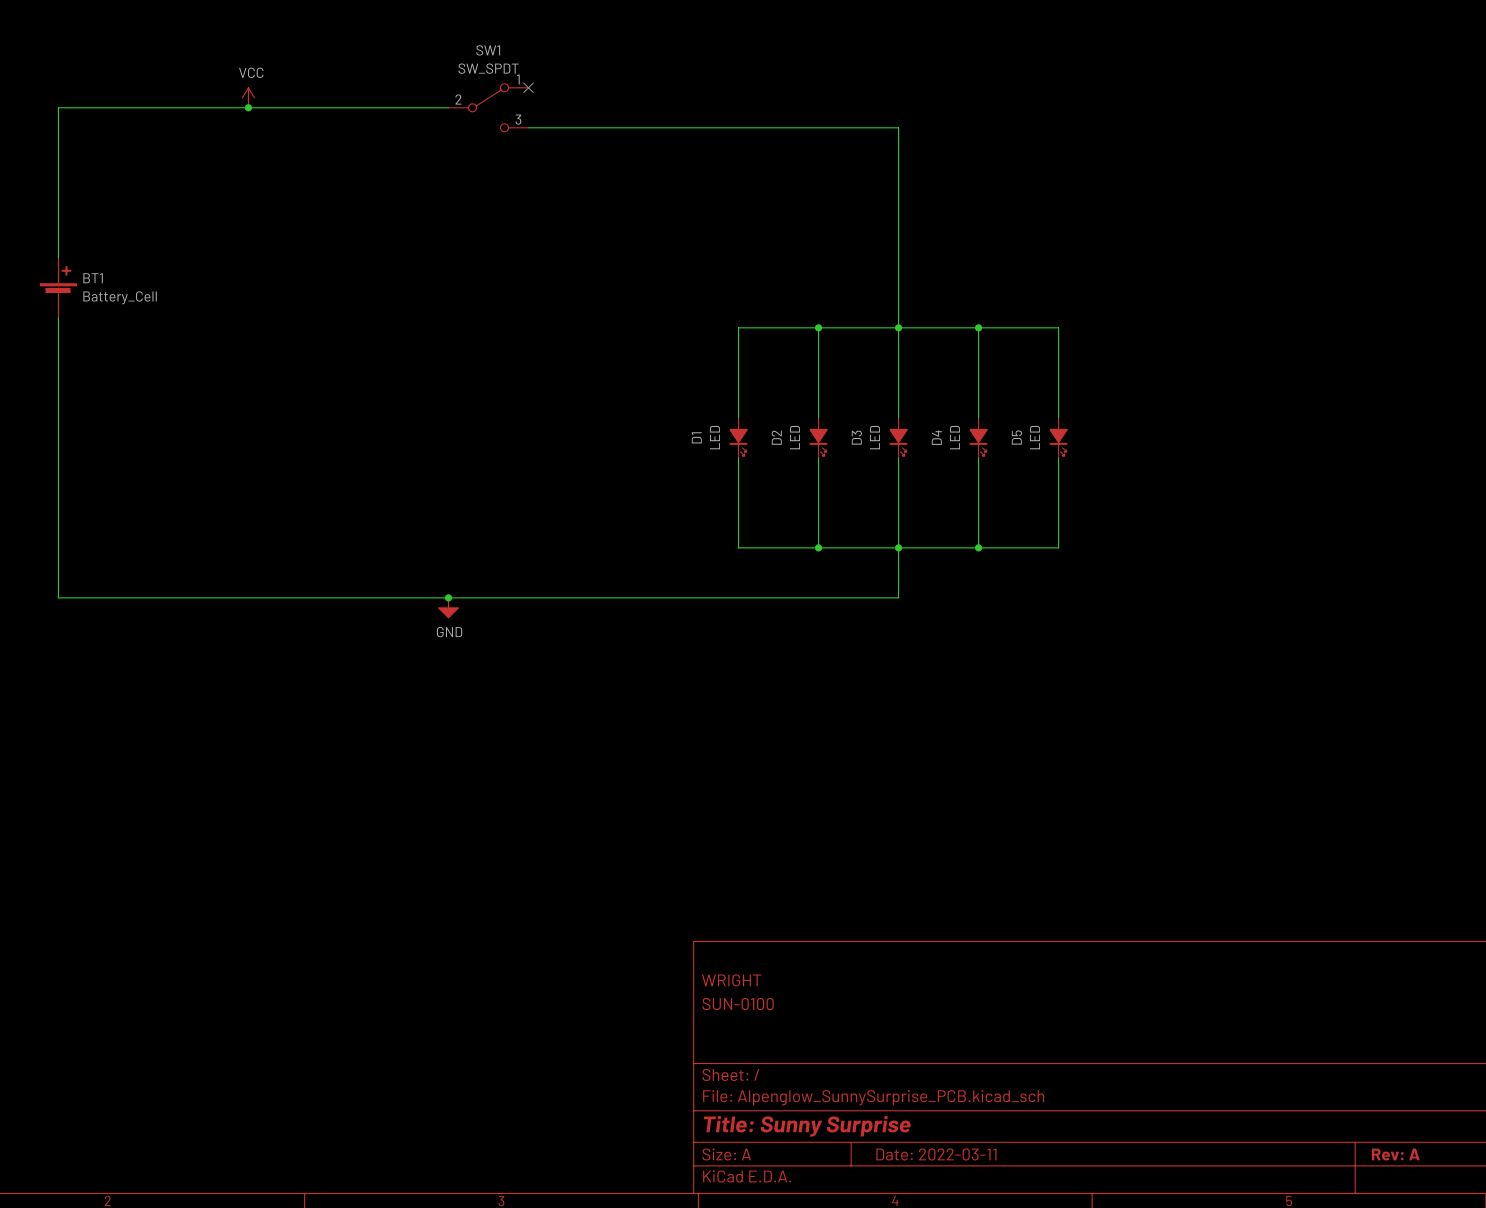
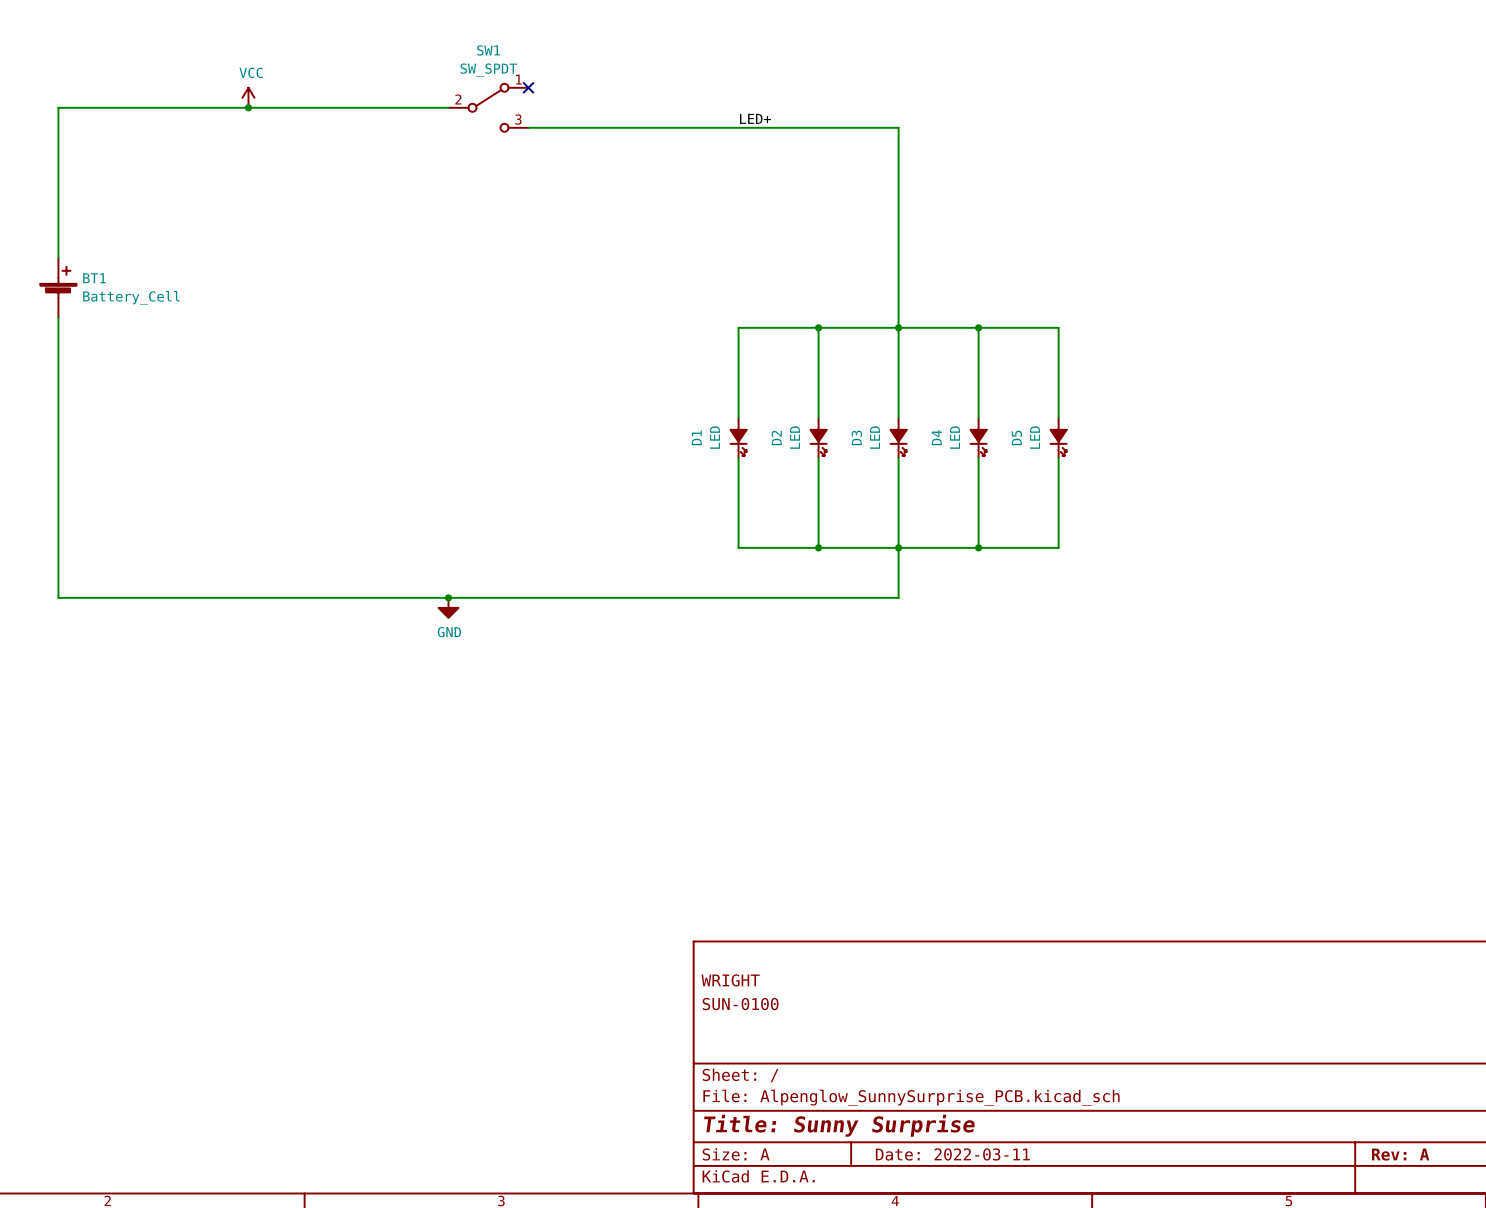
label: none -> LED+ (755, 118)

